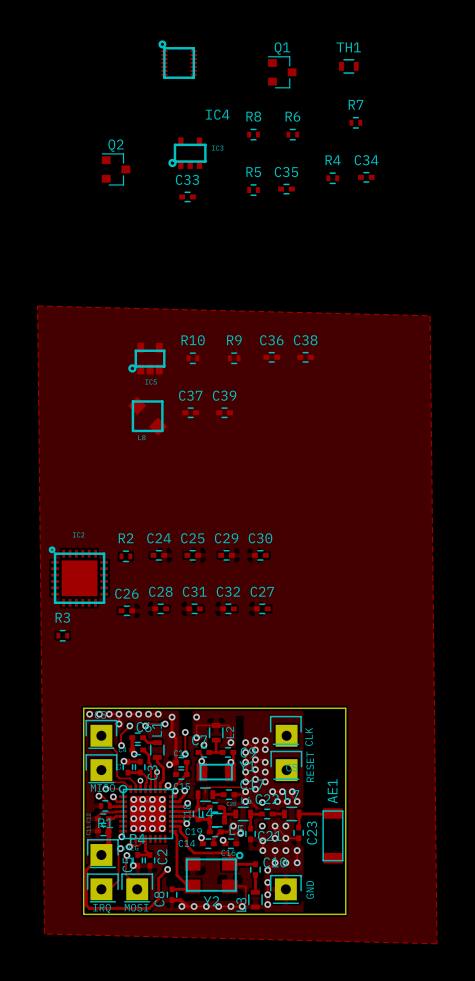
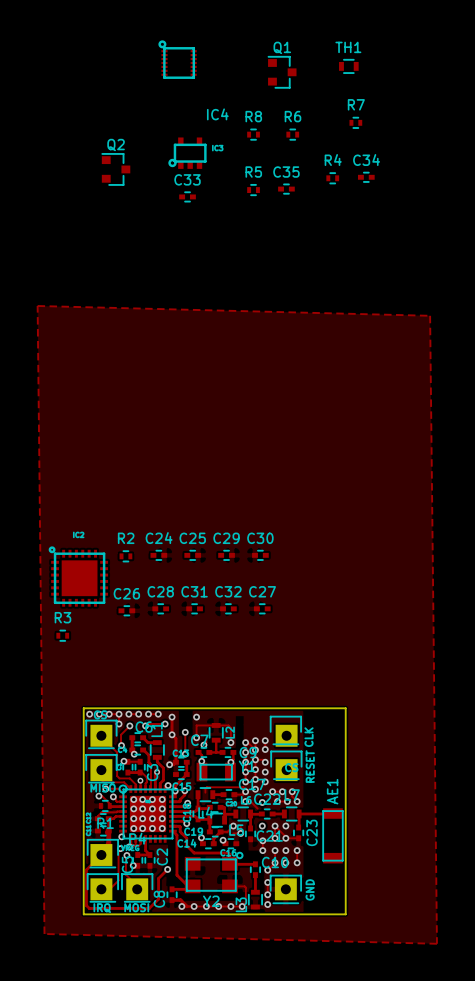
C36: (271, 357) -> none
C38: (305, 357) -> none
part: (146, 358) -> none
R10: (192, 358) -> none
R9: (234, 358) -> none
C37: (190, 412) -> none
C39: (224, 412) -> none
part: (147, 416) -> none

